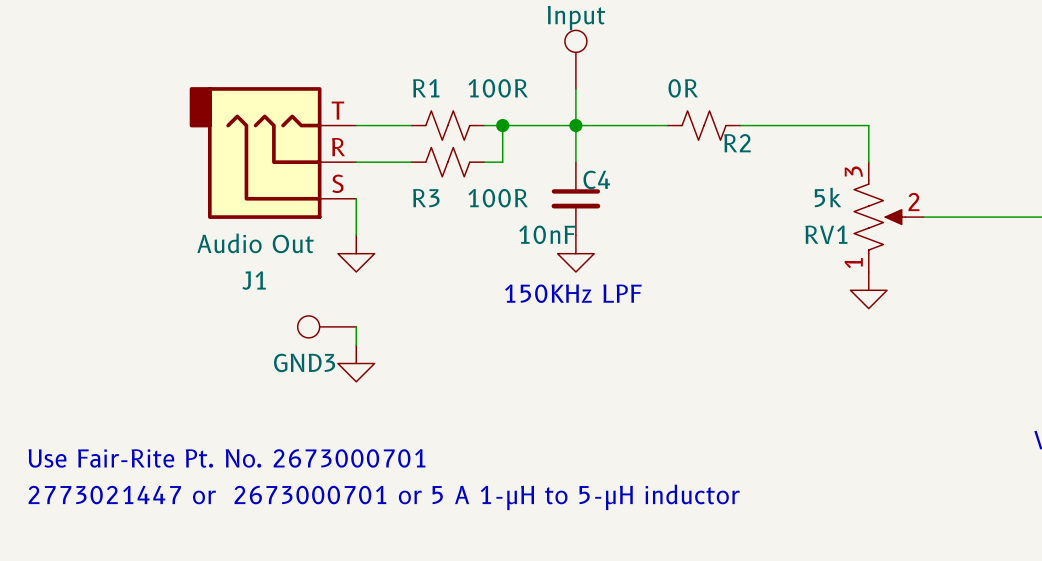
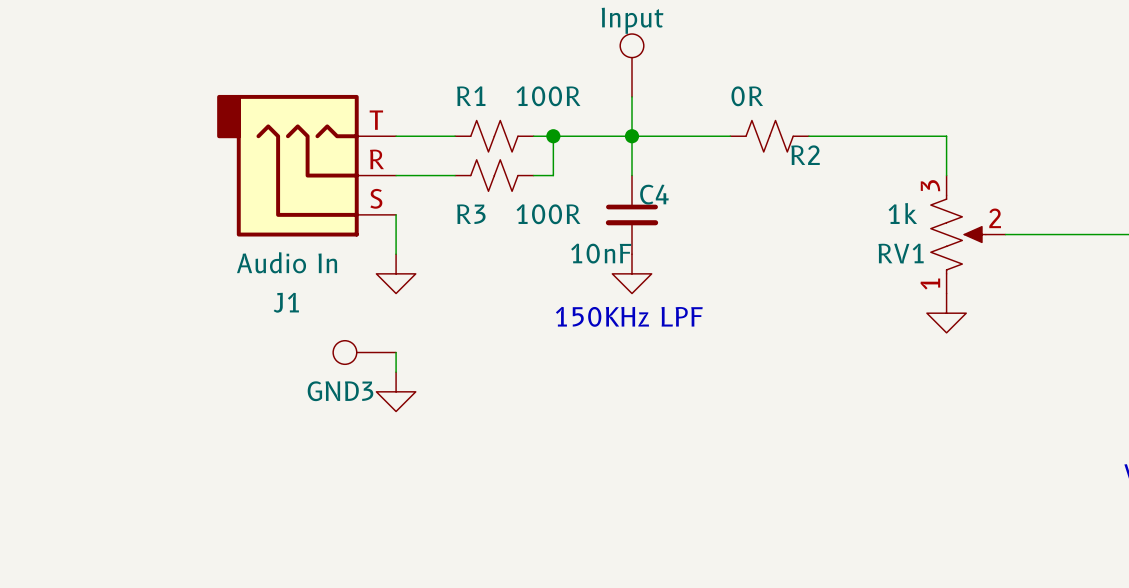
RV1 value: 5k (828, 197) -> 1k (902, 213)
J1 value: Audio Out (255, 243) -> Audio In (287, 262)
text: Use Fair-Rite Pt. No. 2673000701 (226, 458) -> none
text: 2773021447 or 2673000701 or 5 A 1-μH to 5-μH inductor (384, 497) -> none

